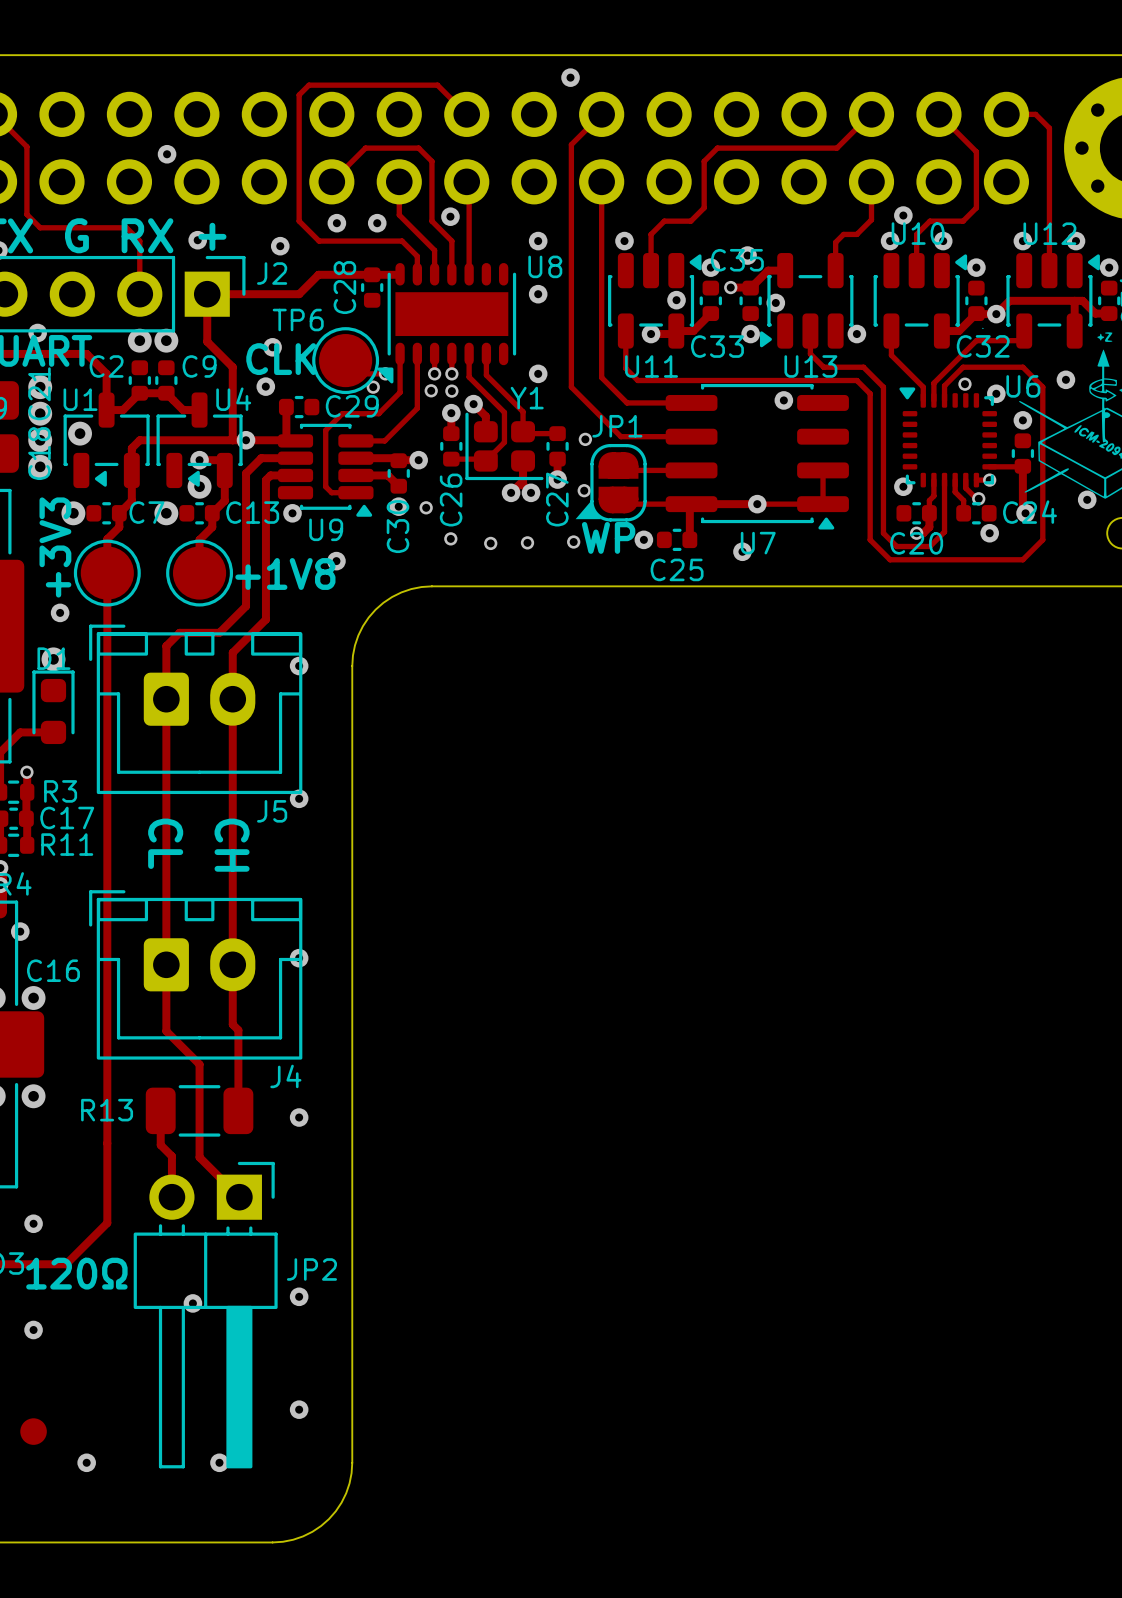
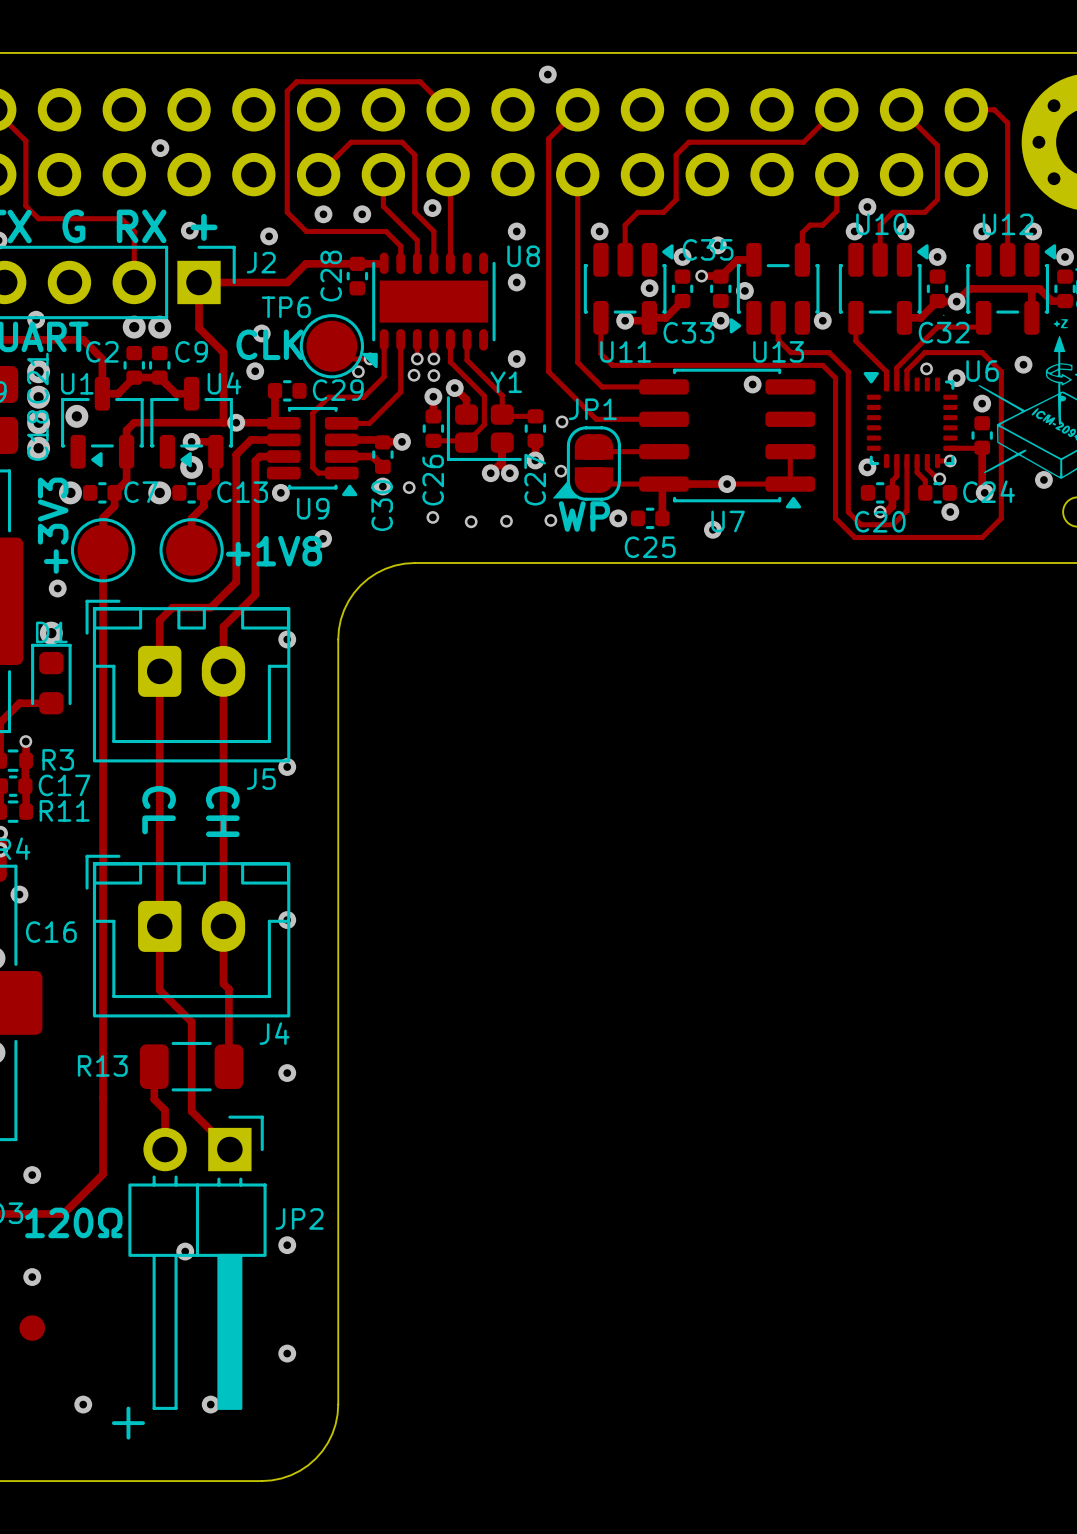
via: (33, 998) -> none
via: (33, 1096) -> none
part position: (33, 1431) -> (32, 1328)
text: none -> + (128, 1423)

